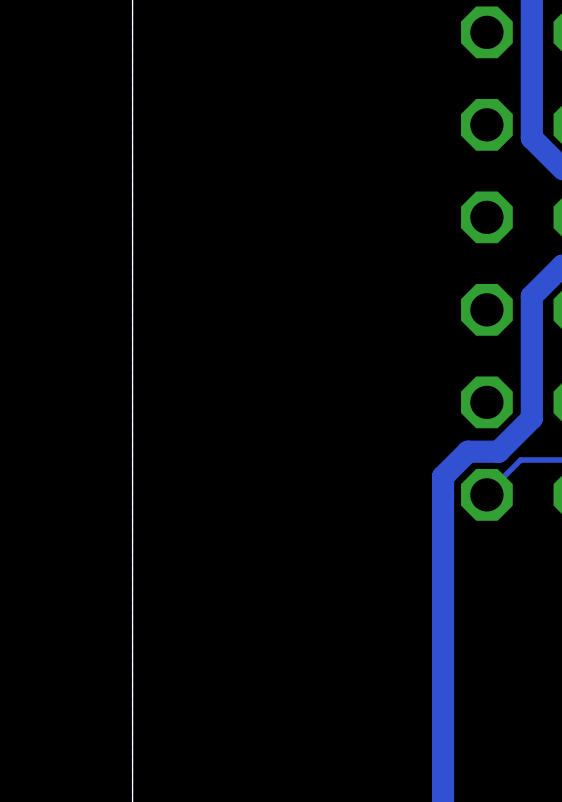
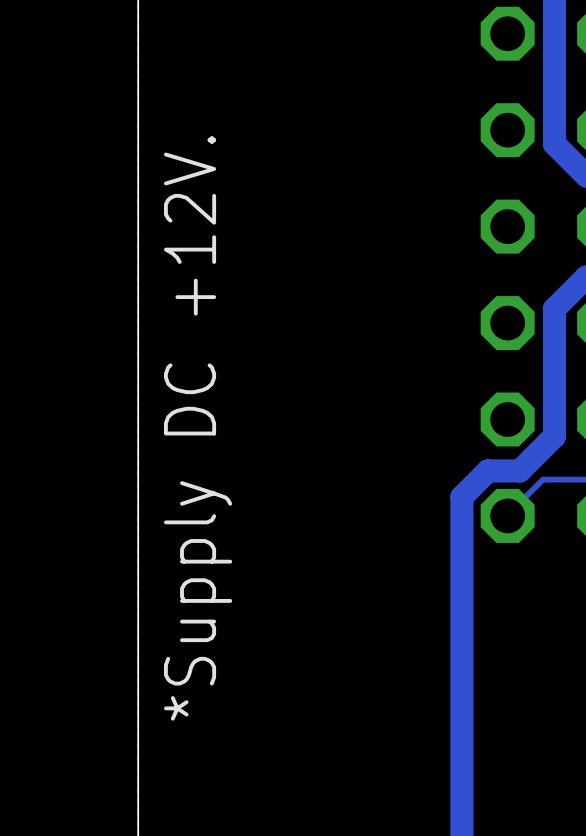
text: none -> *Supply DC +12V. (198, 428)

